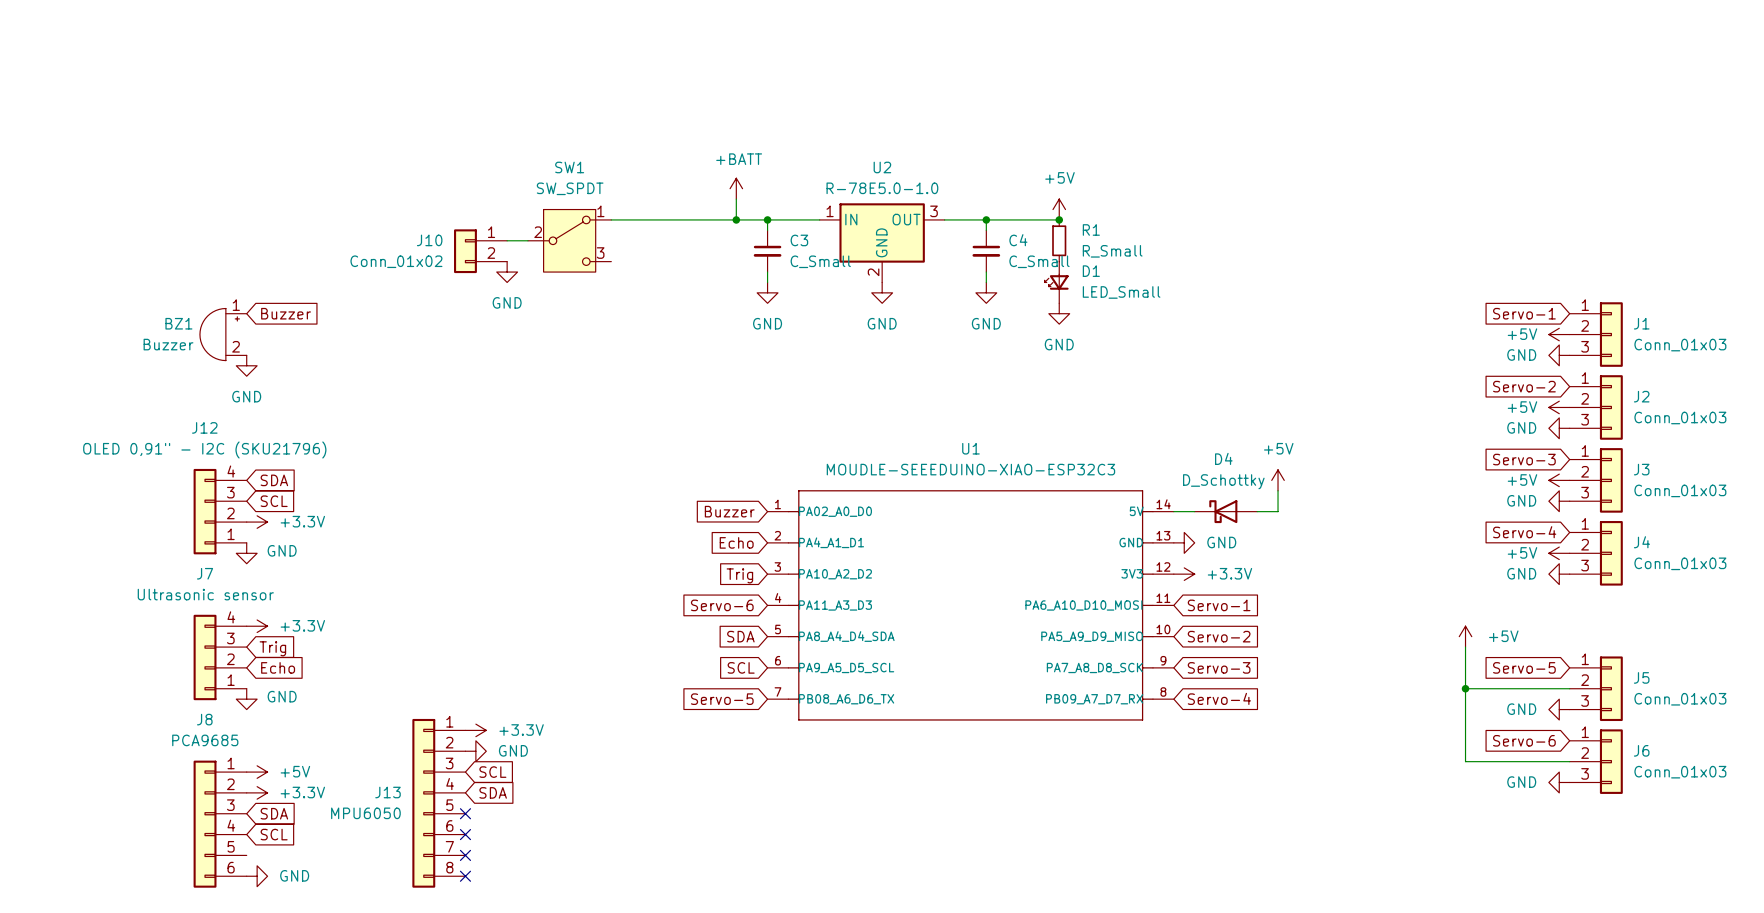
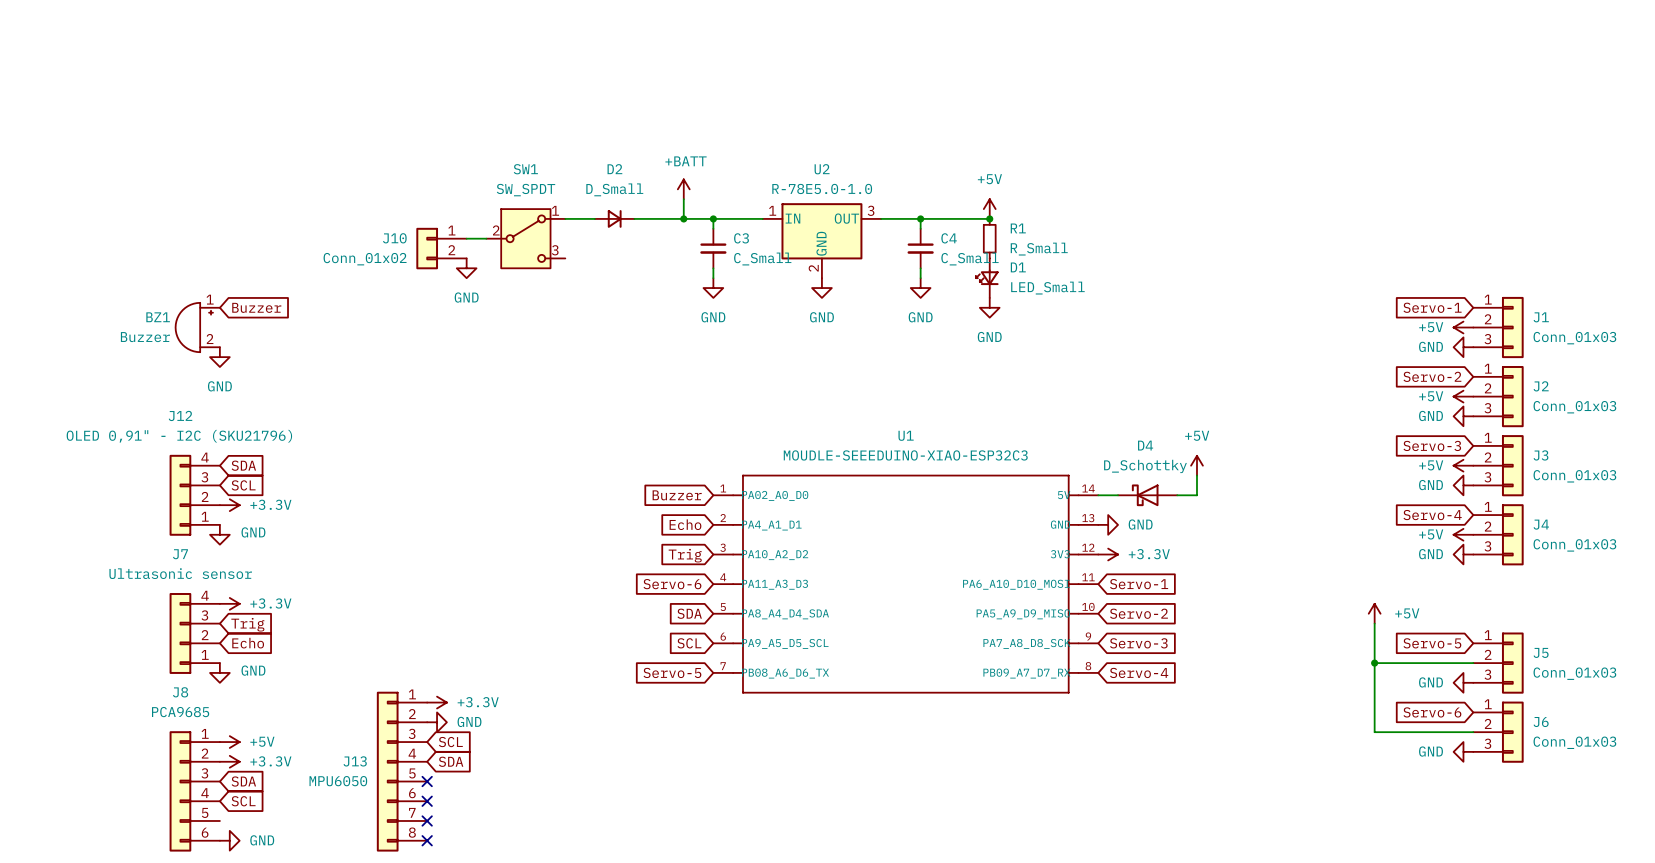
D2: none -> D_Small (614, 218)

